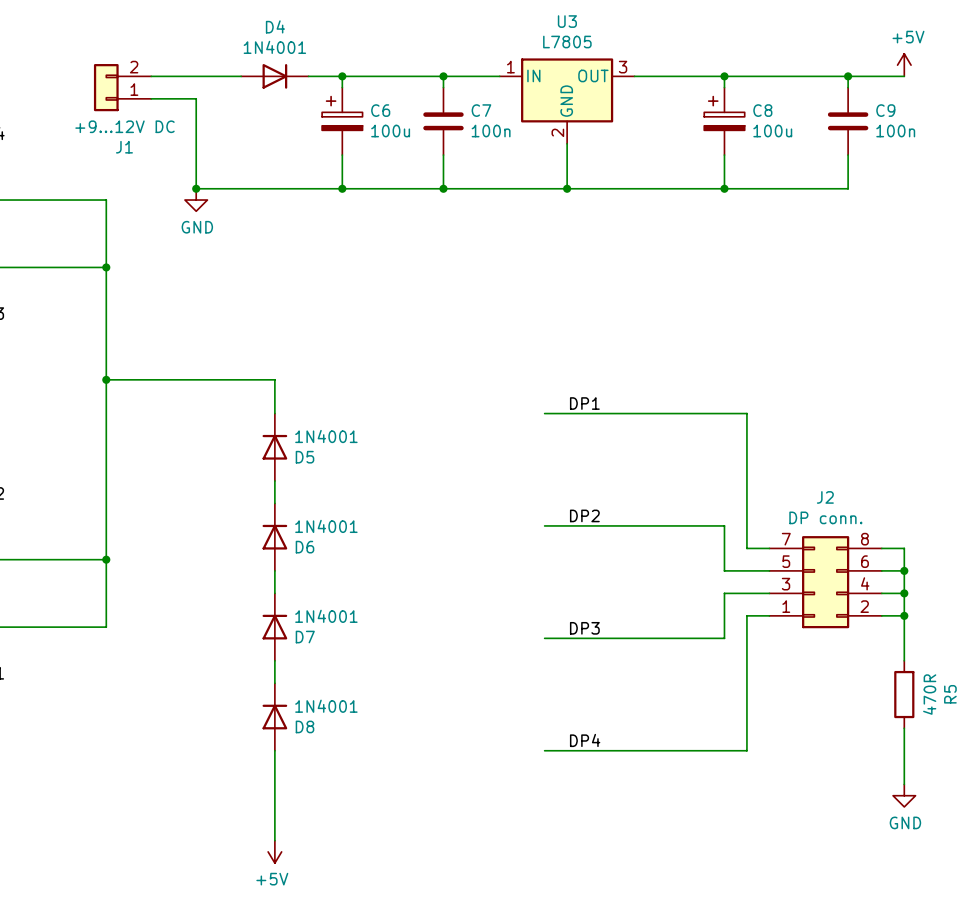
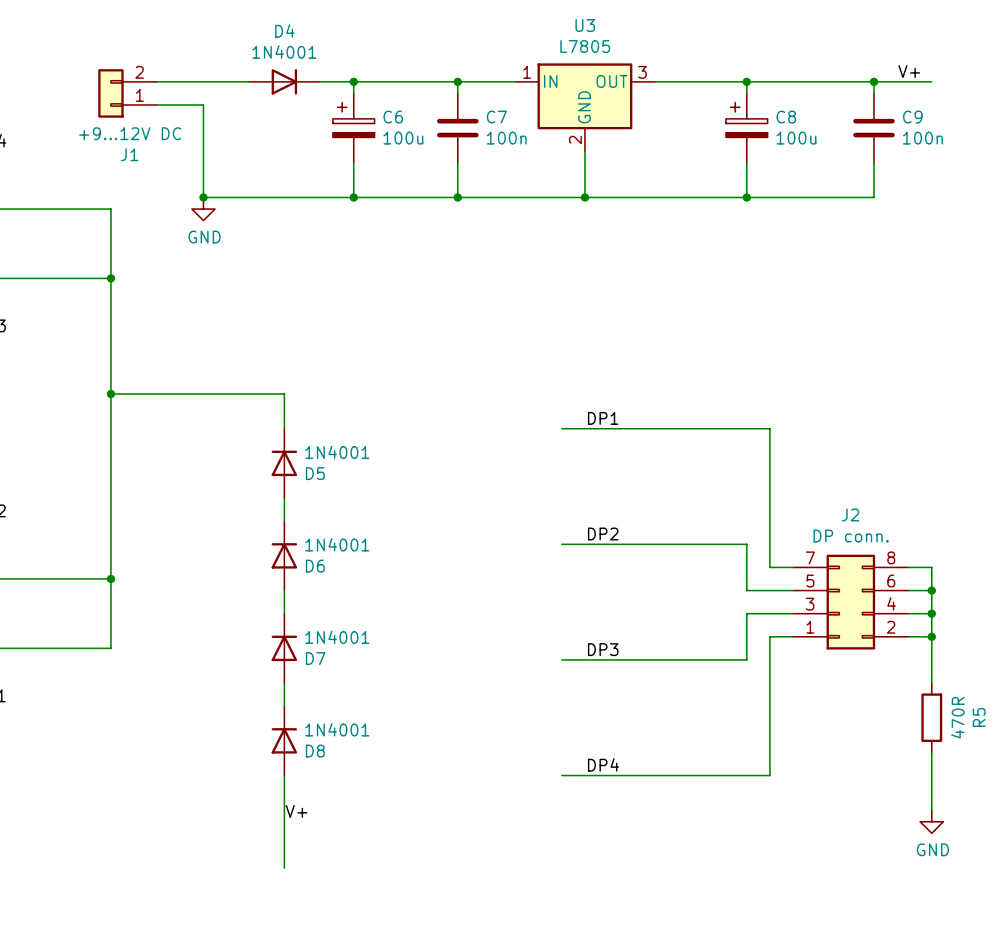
power symbol: +5V (904, 65) -> none
label: none -> V+ (909, 71)
label: none -> V+ (296, 811)
power symbol: +5V (274, 851) -> none

